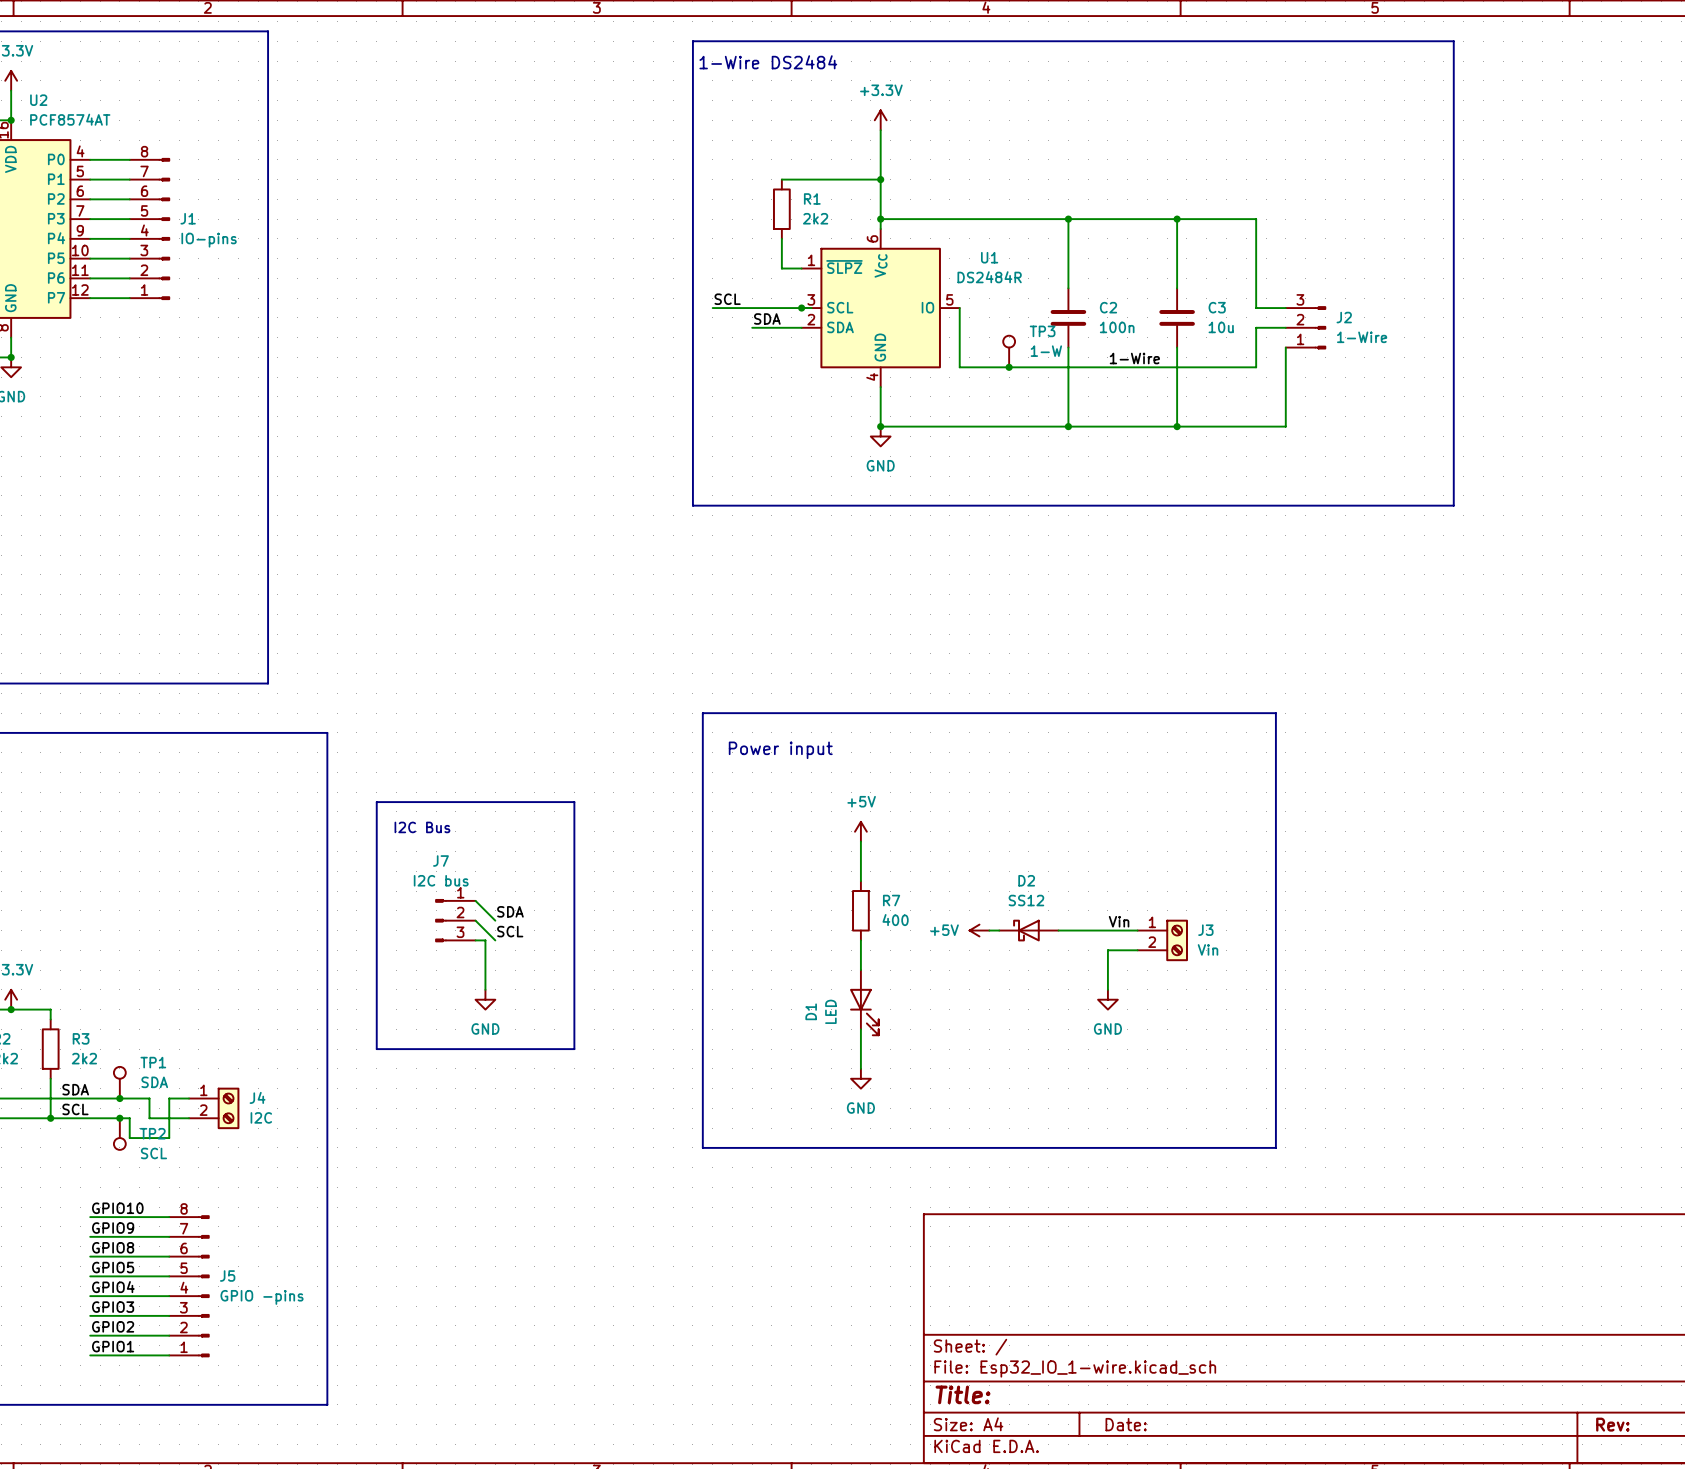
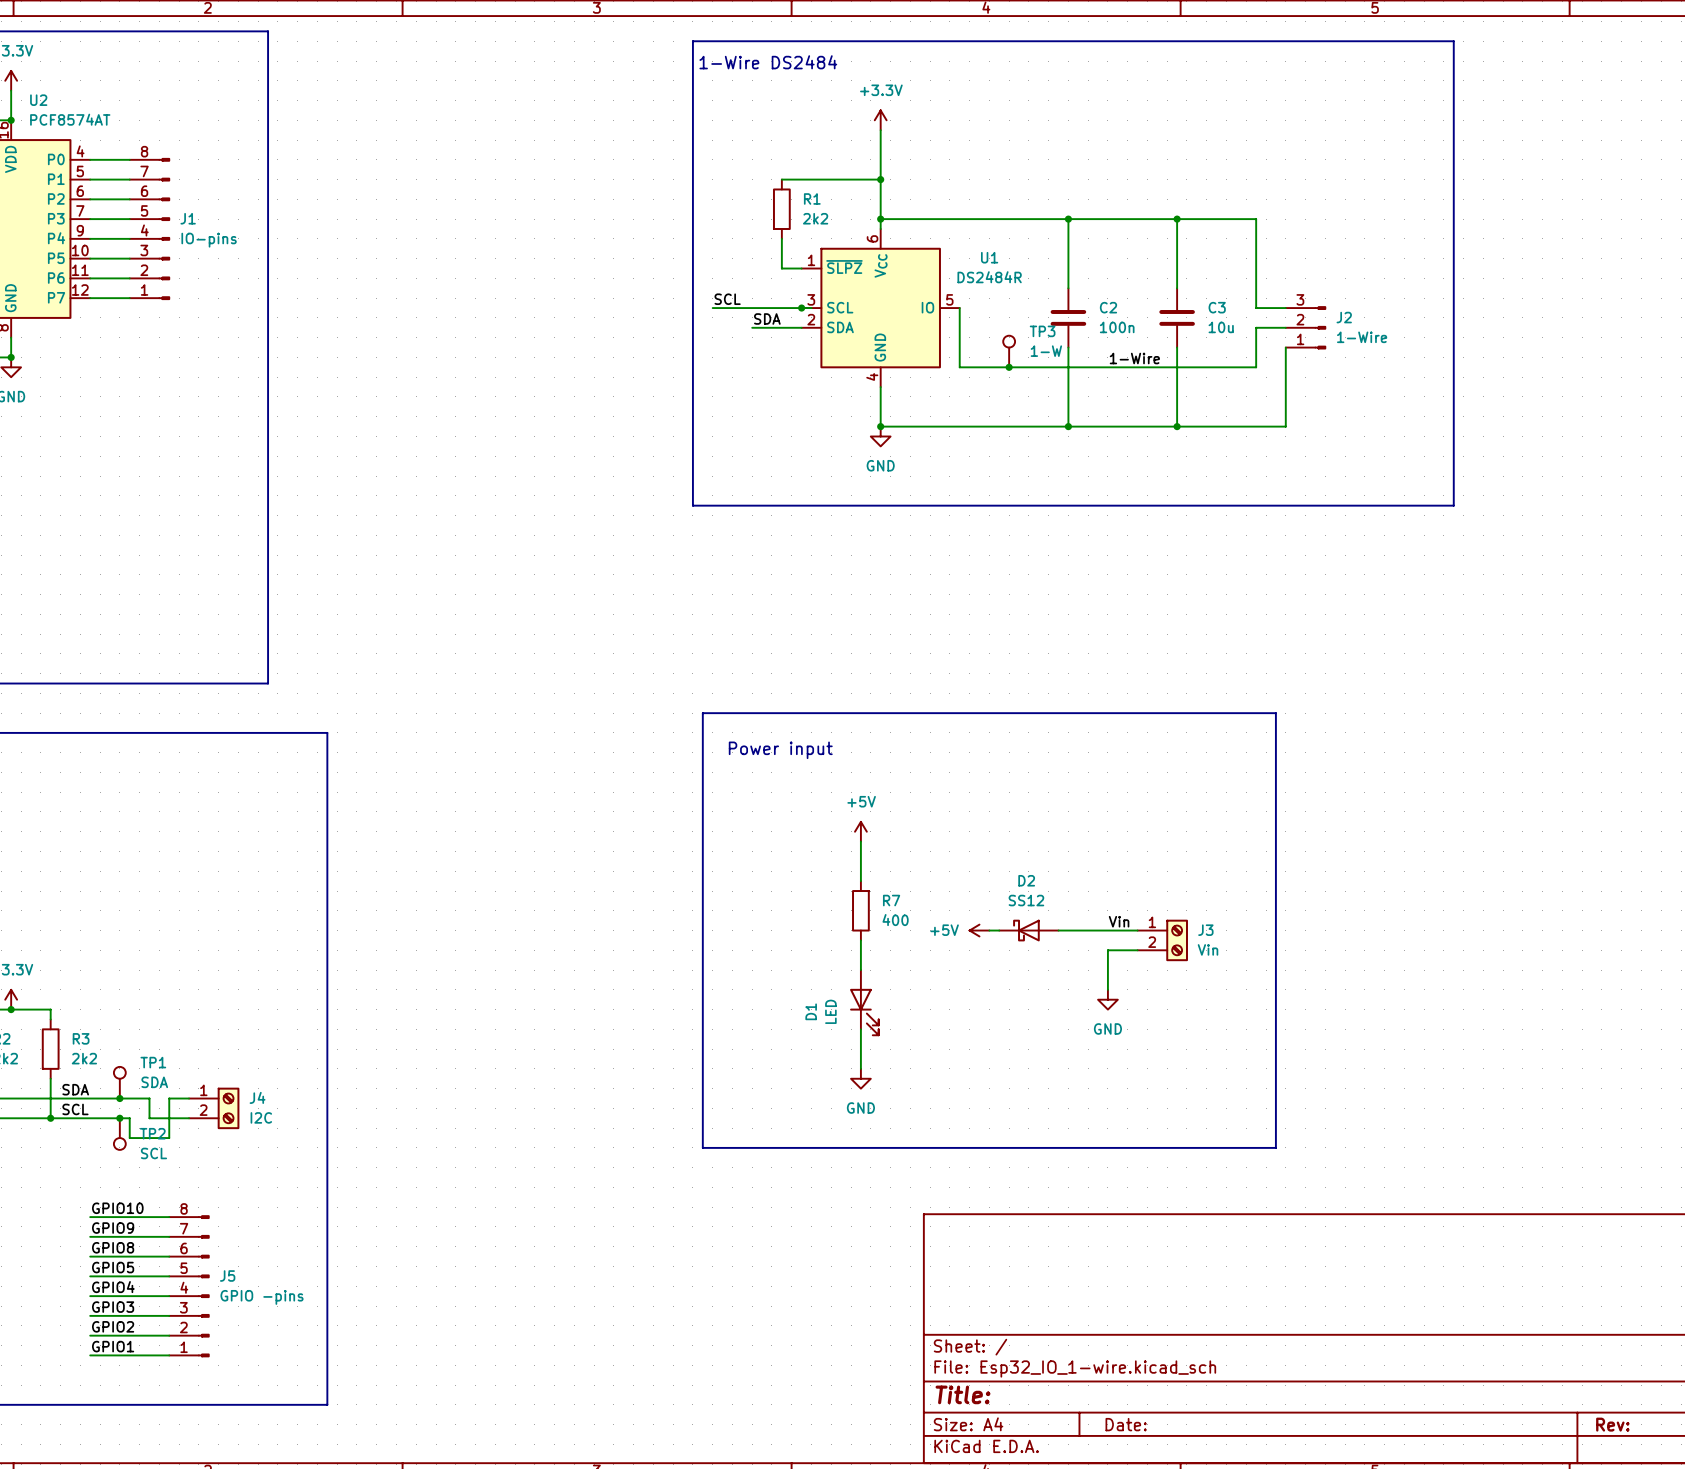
line: (376, 802) (574, 802) (574, 1049) (376, 1049) (376, 802) -> none
text: I2C Bus (422, 827) -> none
wire: (475, 900) (495, 920) -> none
label: SDA (510, 911) -> none
J7: I2C bus (455, 920) -> none
wire: (475, 920) (495, 940) -> none
label: SCL (510, 931) -> none
wire: (475, 940) (485, 940) (485, 989) -> none
power symbol: GND (485, 999) -> none

